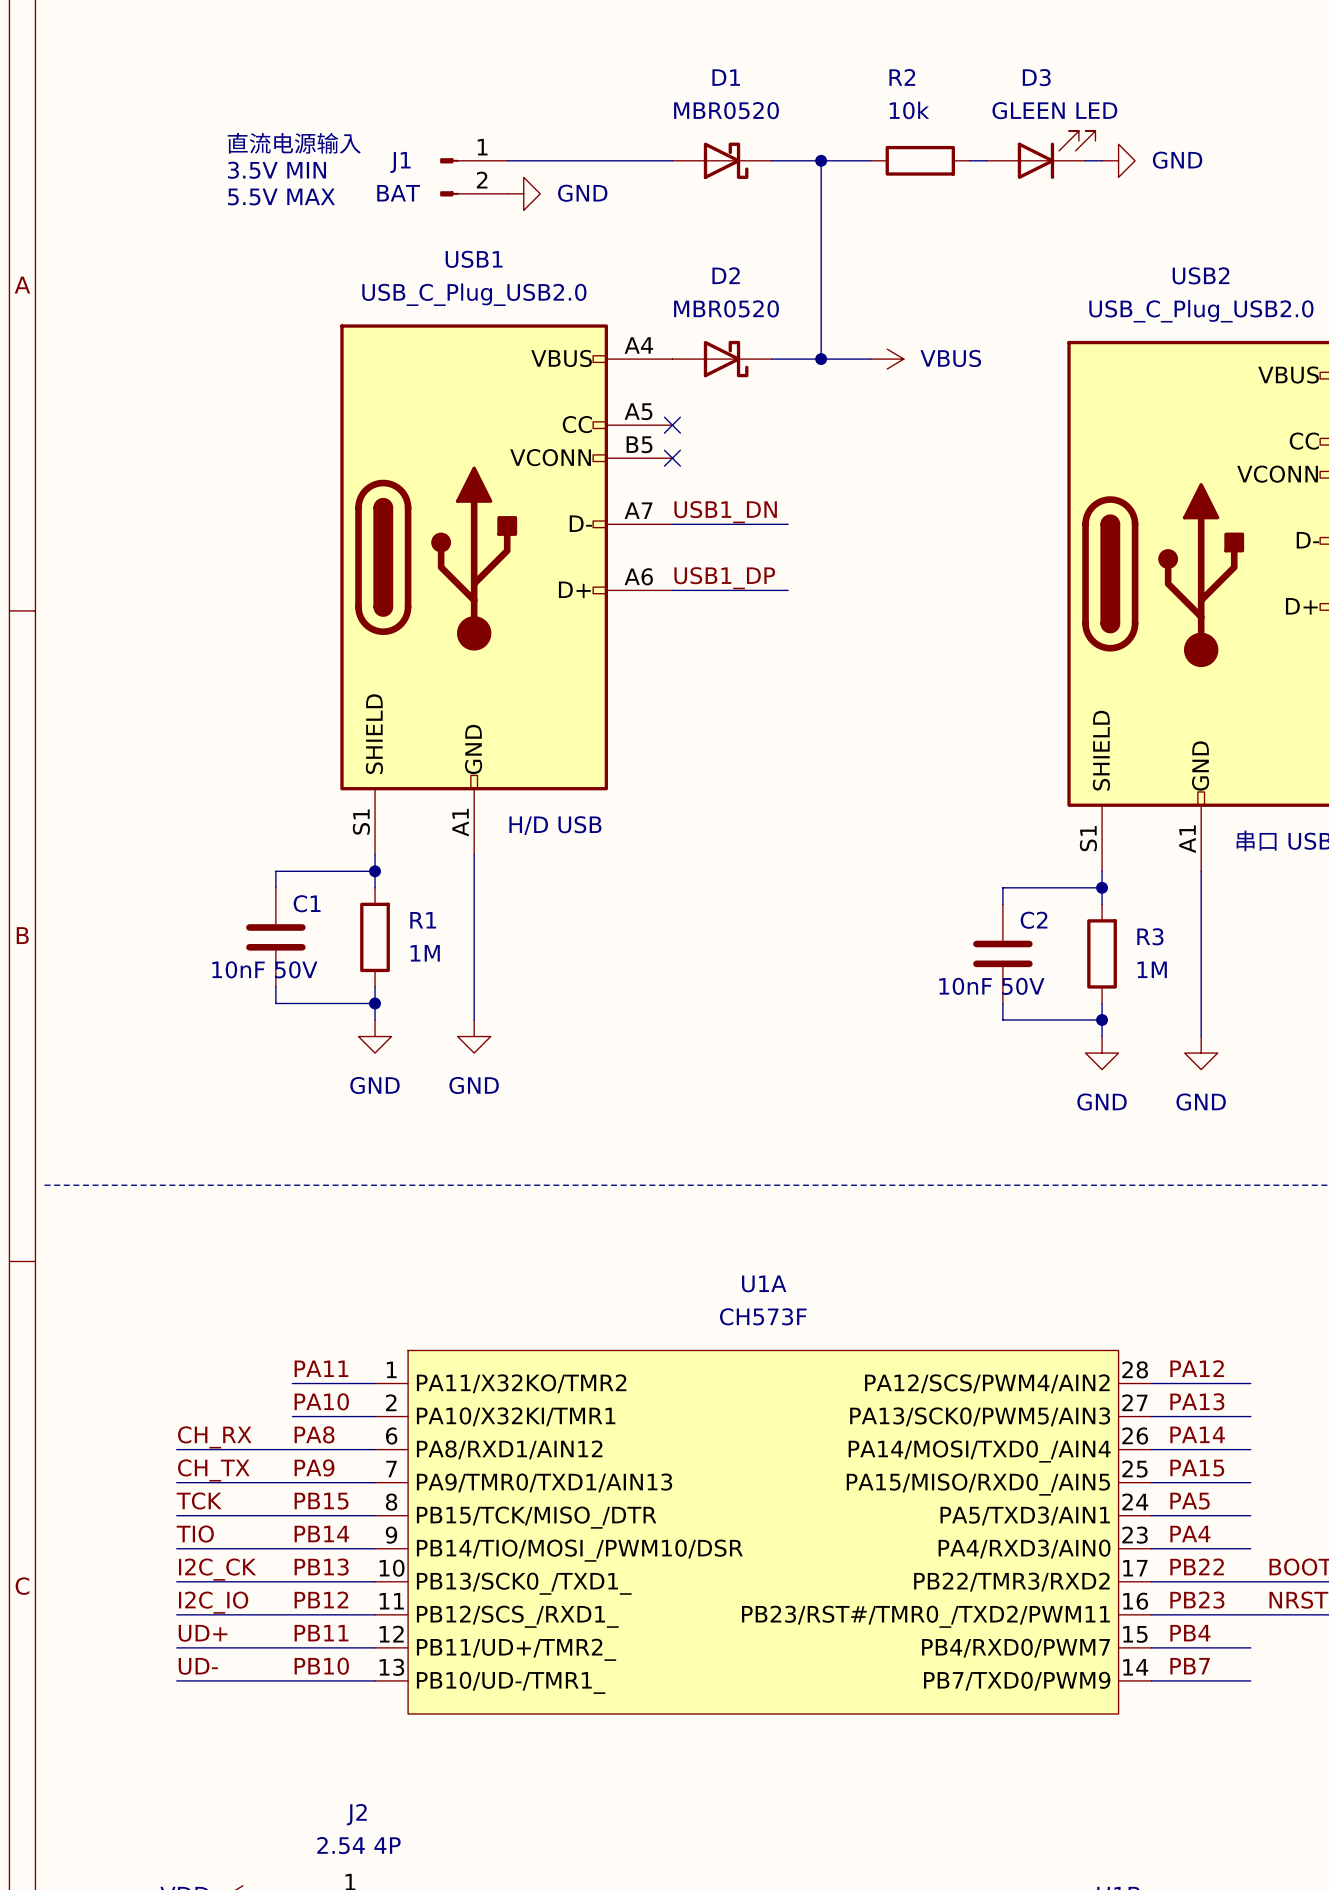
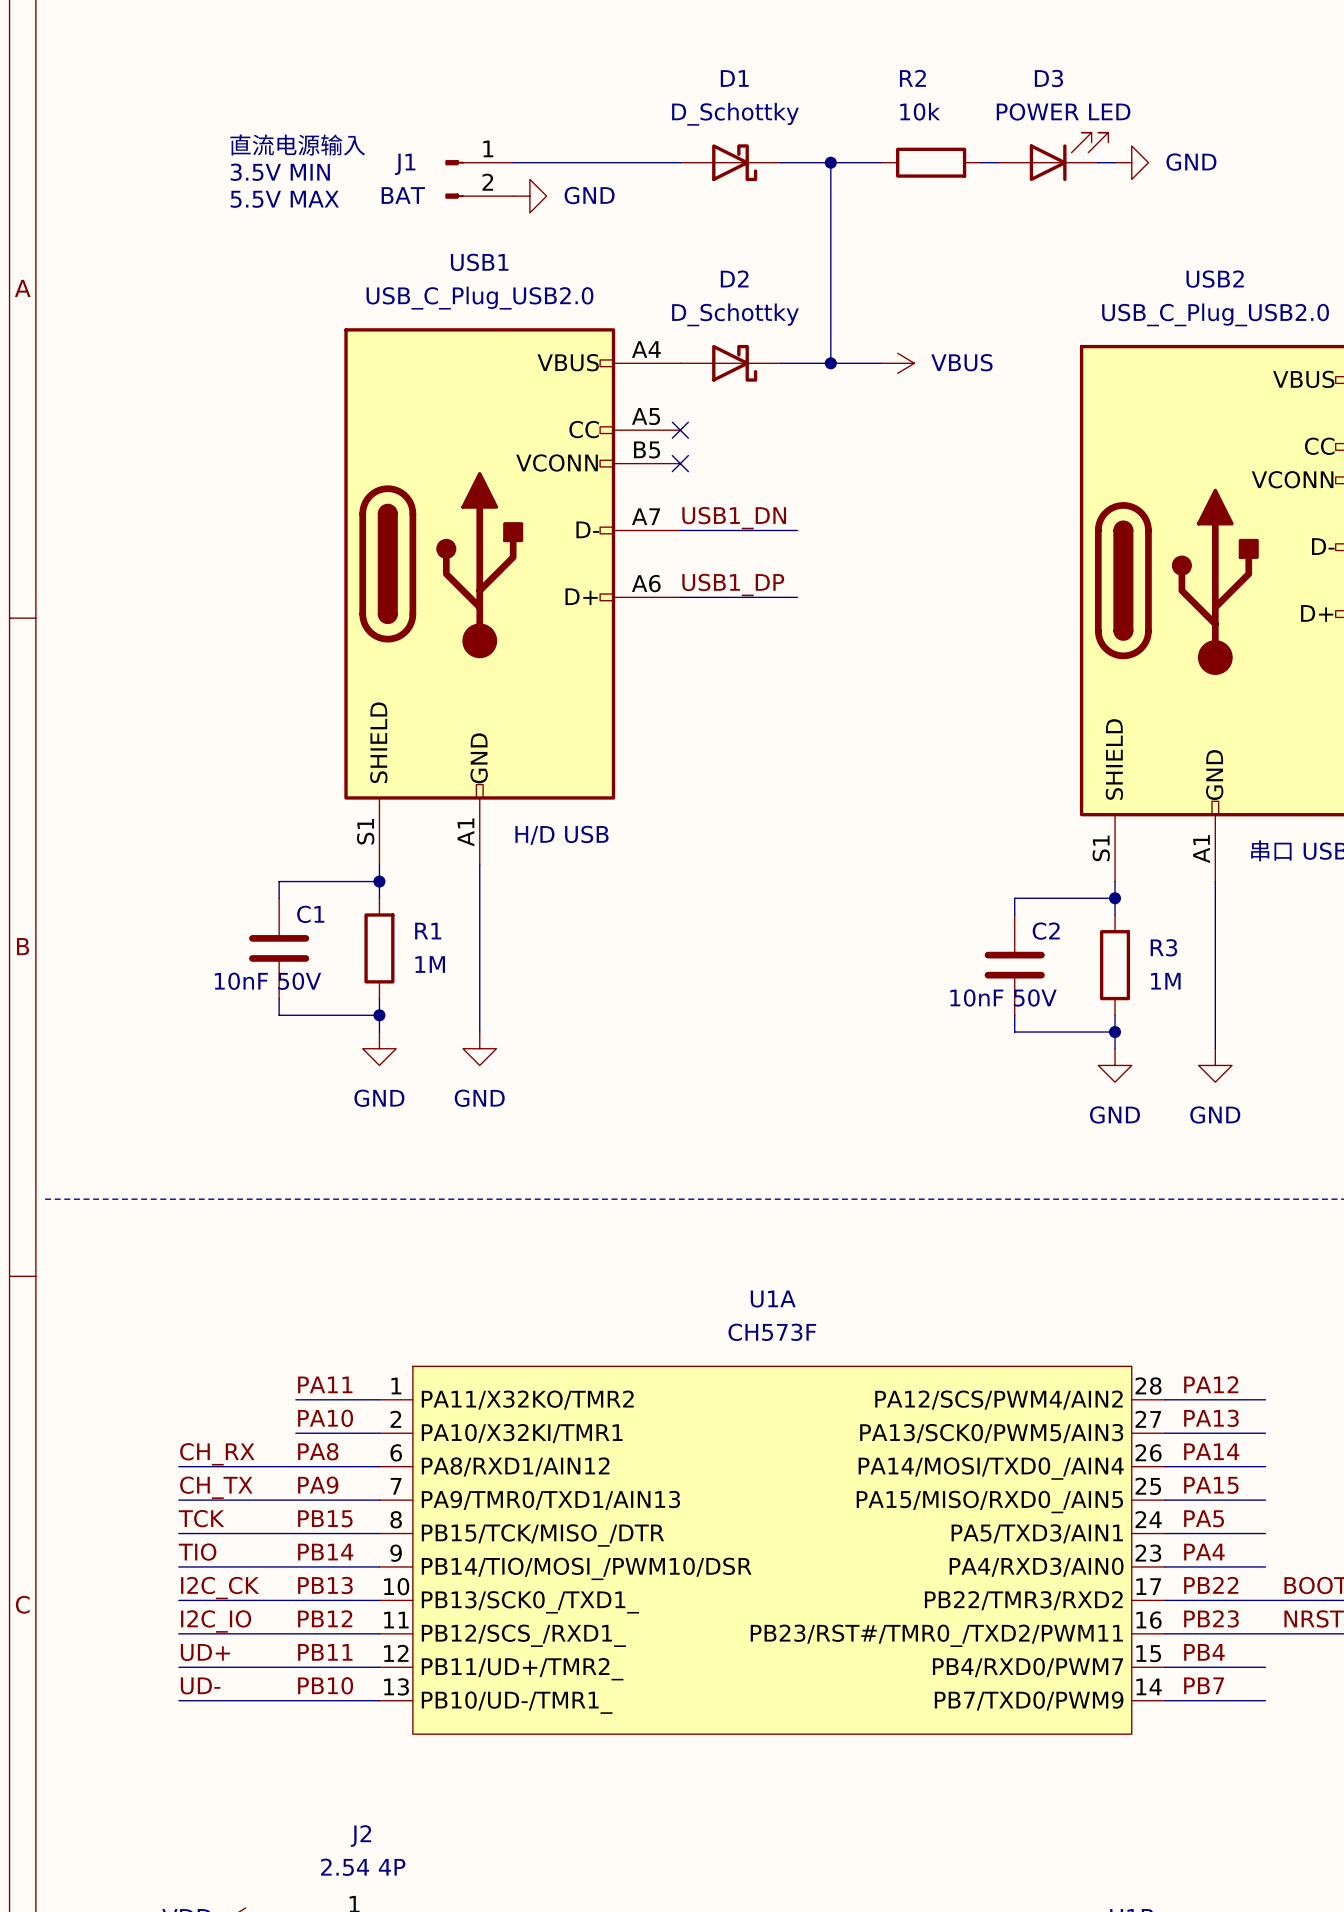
D1 value: MBR0520 (726, 110) -> D_Schottky (735, 114)
D3 value: GLEEN LED (1054, 110) -> POWER LED (1063, 111)
D2 value: MBR0520 (726, 308) -> D_Schottky (735, 314)

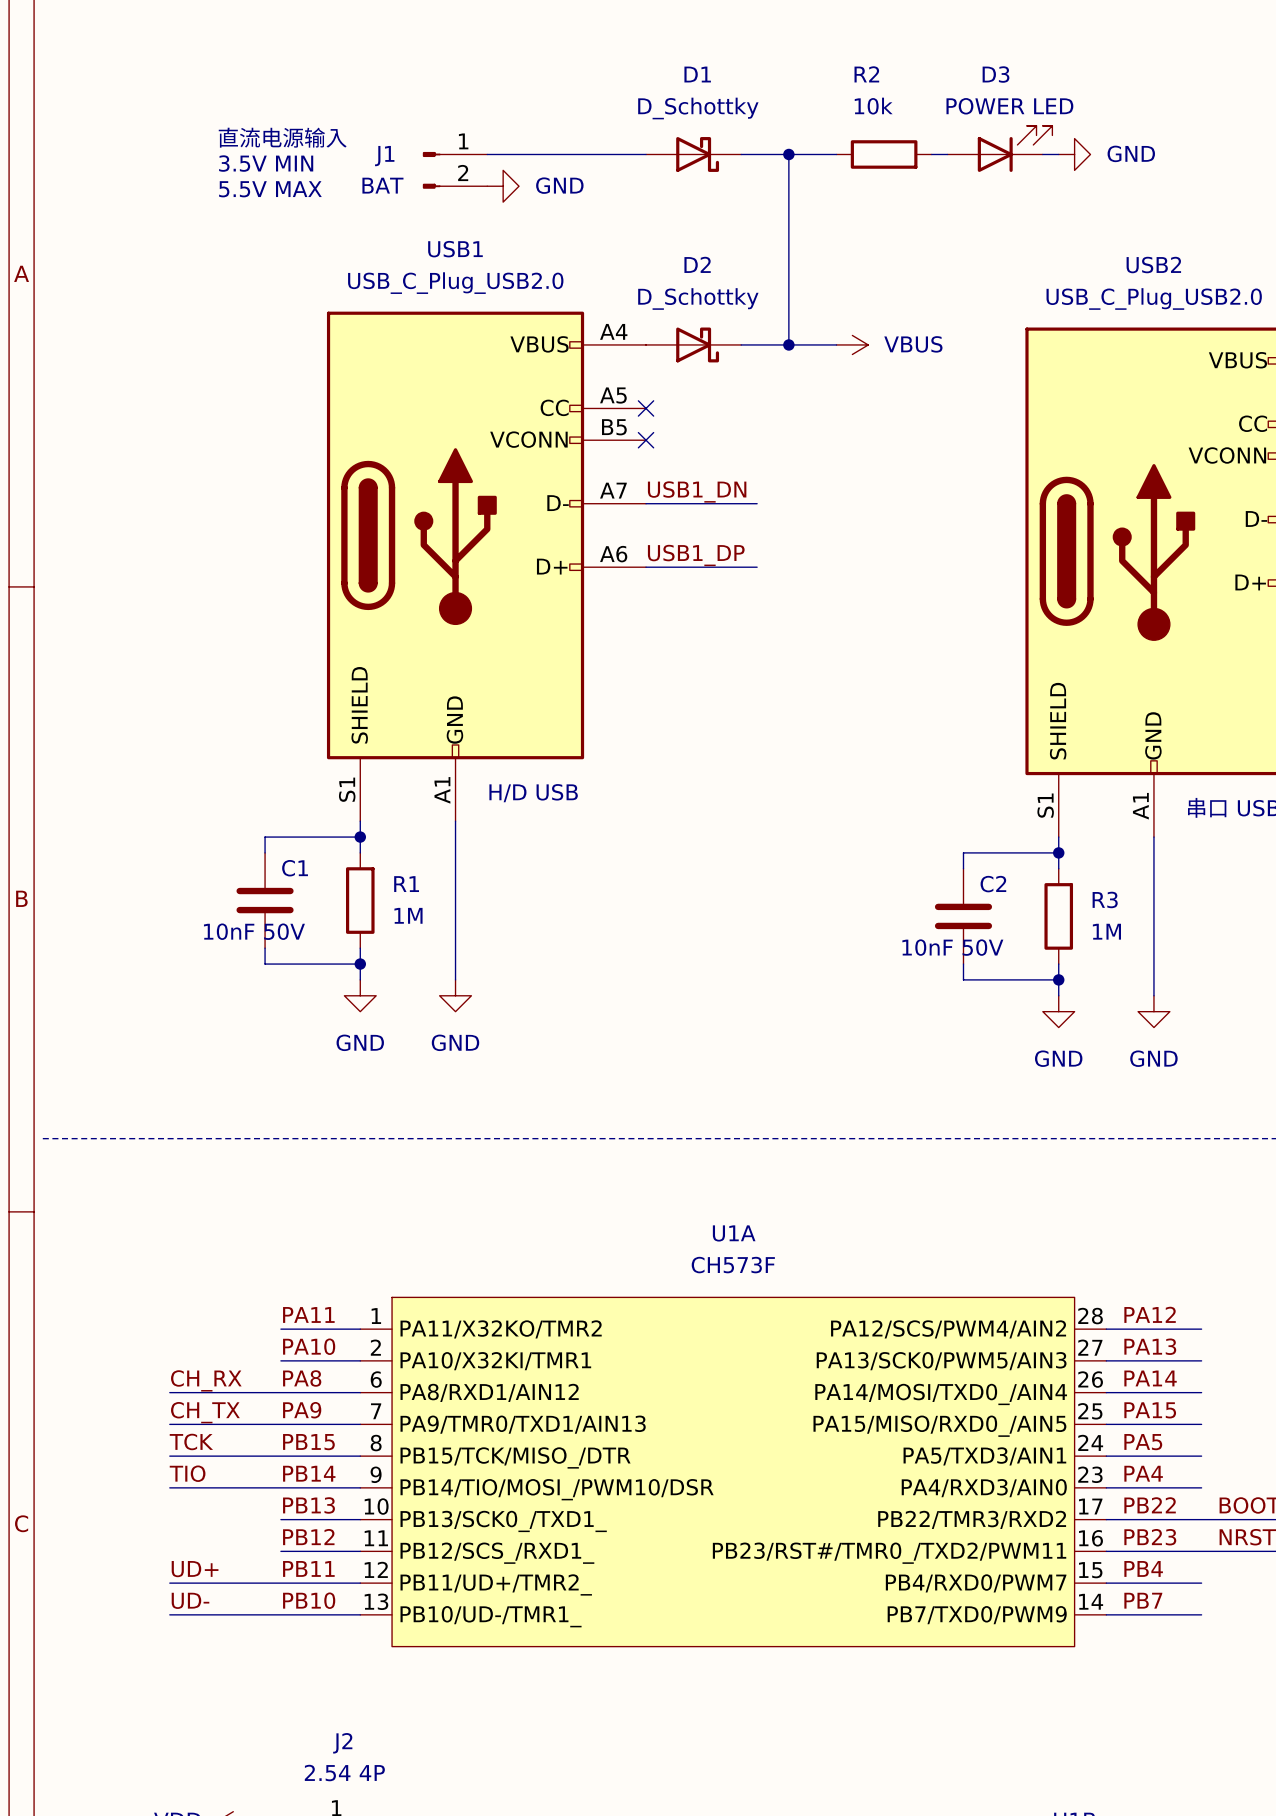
label: I2C_CK (220, 1588) -> none
wire: (178, 1600) (295, 1600) -> none
label: I2C_IO (216, 1621) -> none
wire: (178, 1633) (295, 1633) -> none

